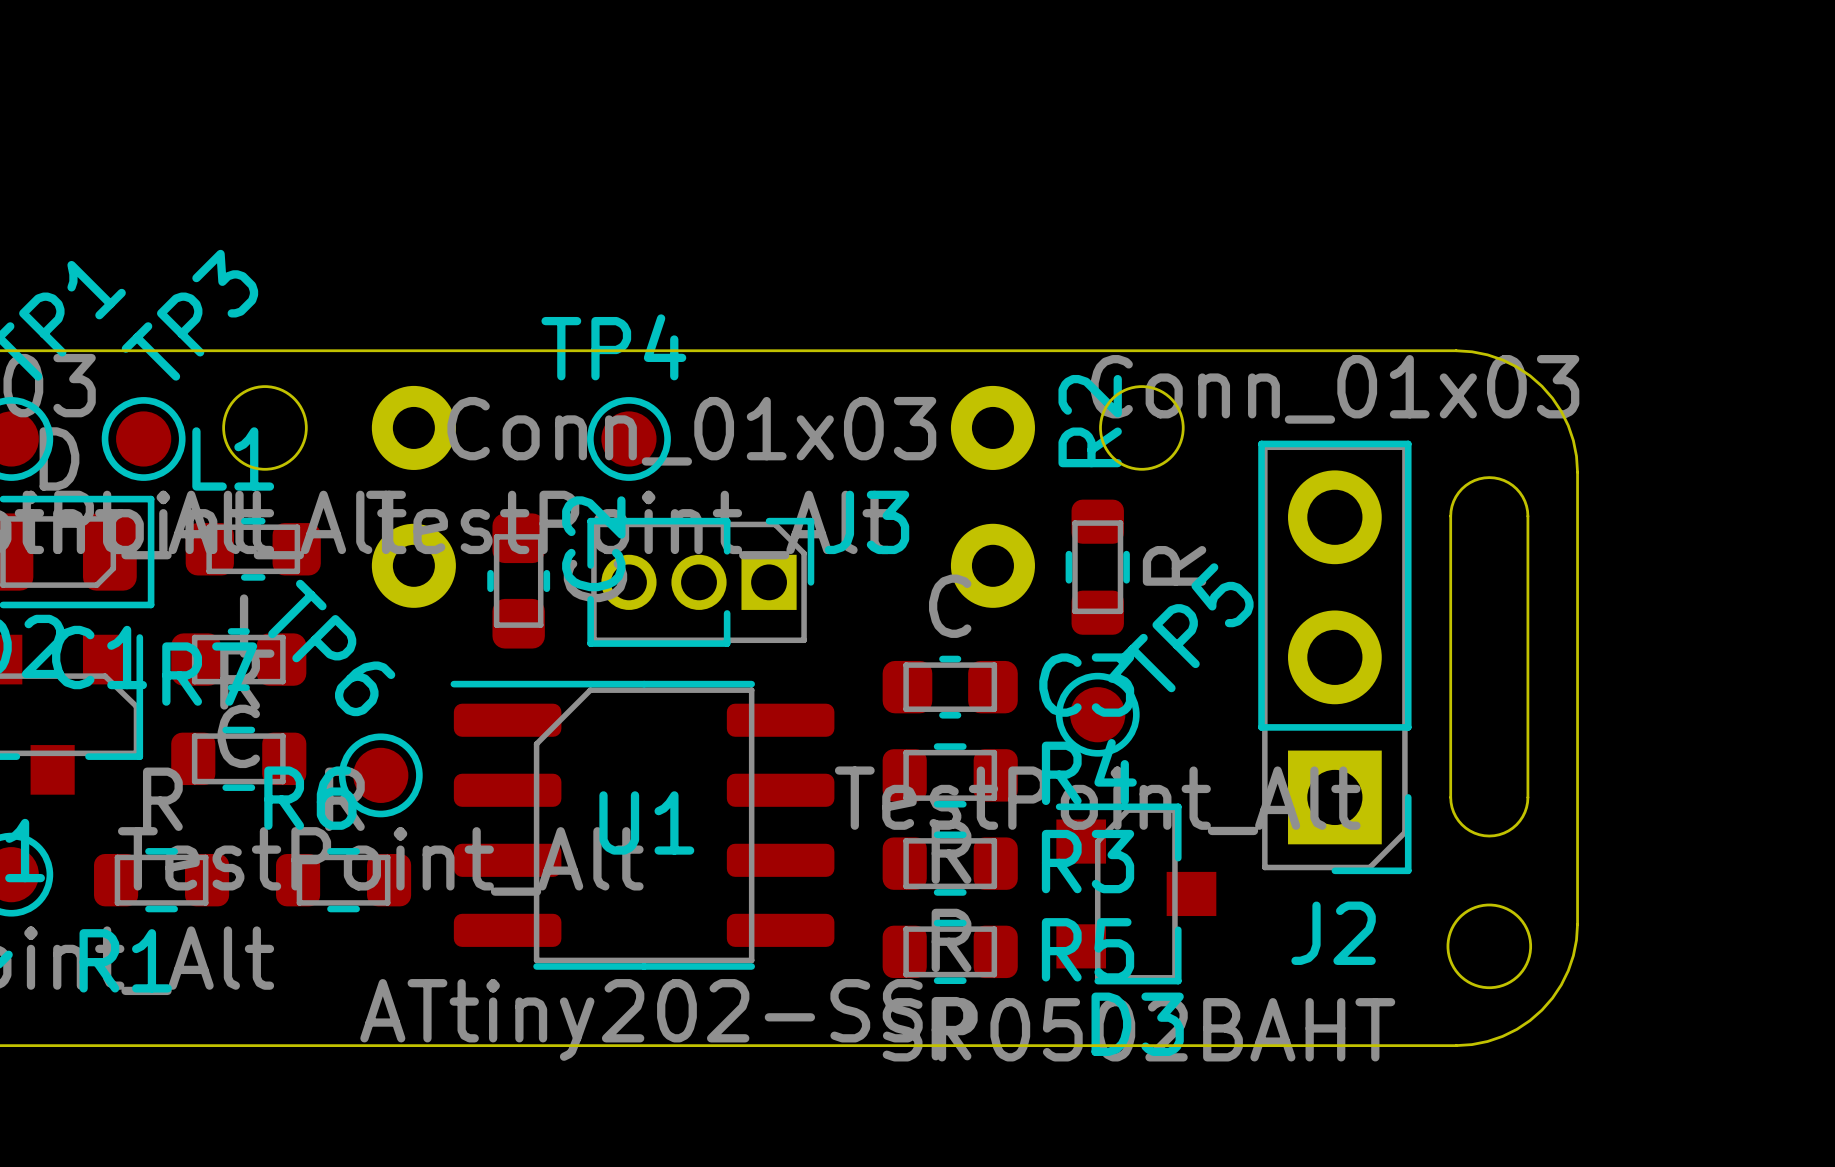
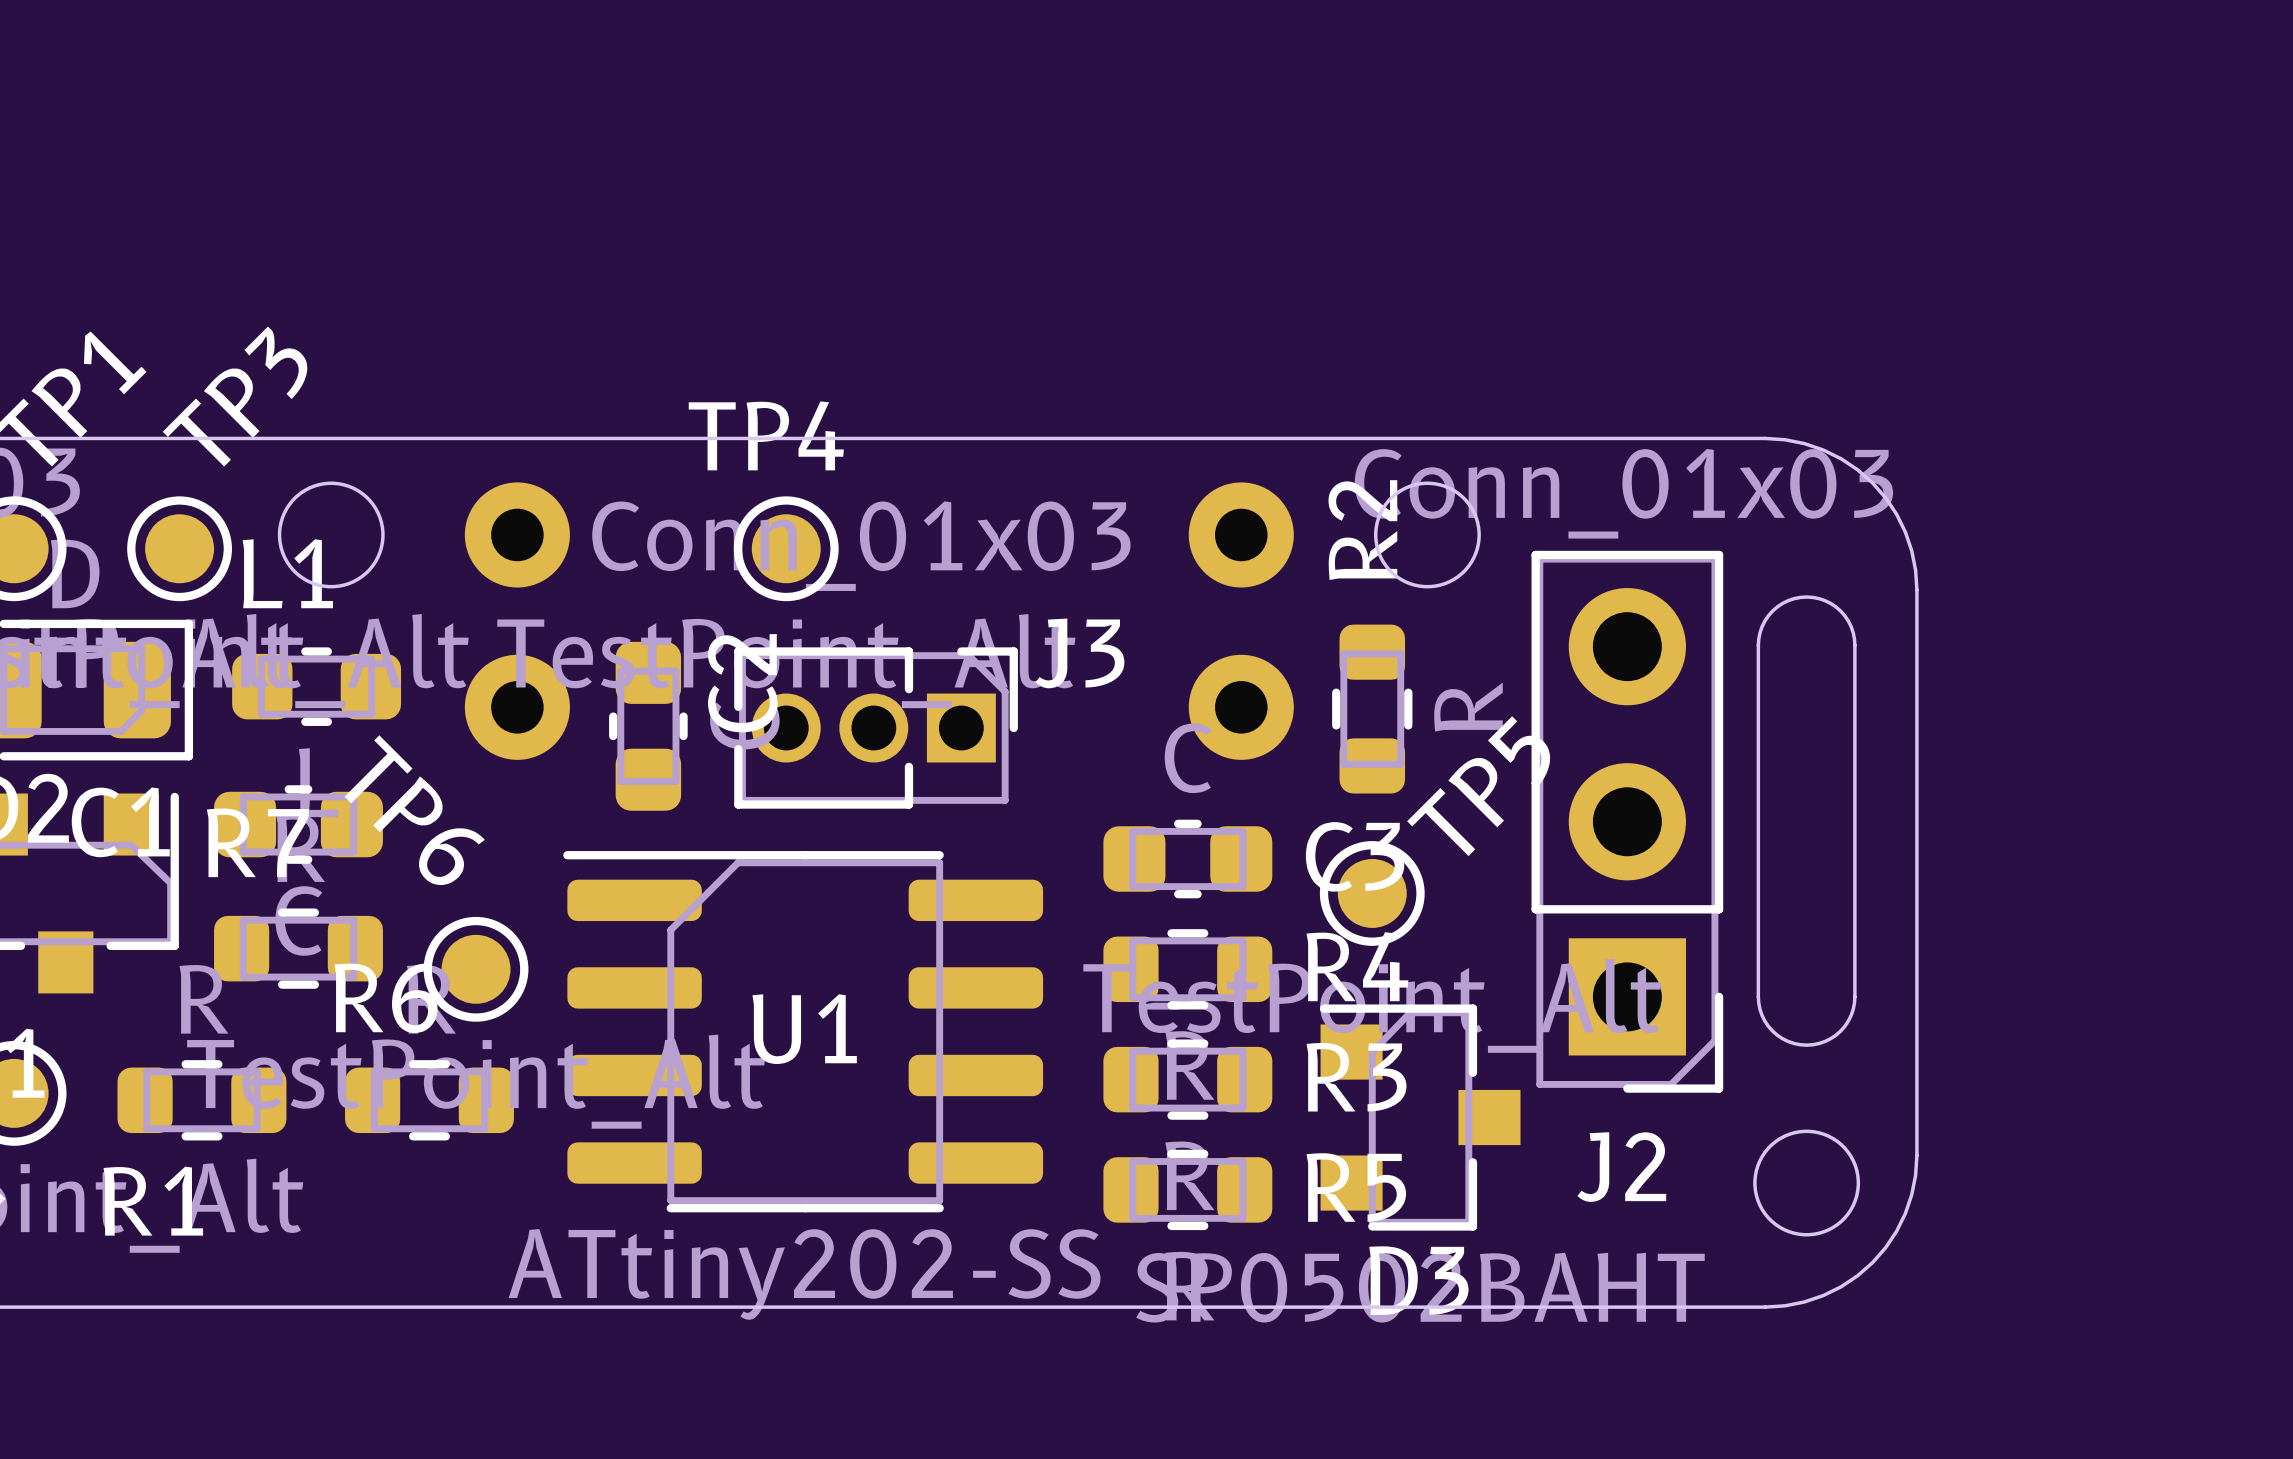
board edge: (1412, 350) (1456, 350) (1487, 354) (1516, 366) (1530, 375) (1552, 398) (1561, 411) (1573, 440) (1577, 472) (1577, 924) (1573, 955) (1561, 984) (1552, 998) (1530, 1020) (1516, 1029) (1487, 1041) (1472, 1044) (1412, 1045) -> (1765, 438) (1785, 439) (1823, 449) (1857, 469) (1872, 482) (1896, 514) (1905, 532) (1915, 570) (1916, 590) (1916, 1155) (1911, 1194) (1896, 1231) (1872, 1262) (1857, 1275) (1823, 1295) (1785, 1305) (1765, 1307)
board edge: (1450, 516) (1451, 802) (1455, 816) (1465, 828) (1479, 834) (1494, 835) (1504, 833) (1516, 824) (1524, 812) (1527, 802) (1527, 511) (1524, 501) (1516, 488) (1504, 480) (1489, 477) (1474, 480) (1462, 488) (1453, 501) (1450, 516) -> (1758, 645) (1758, 1003) (1764, 1021) (1777, 1035) (1794, 1043) (1812, 1044) (1825, 1041) (1840, 1031) (1851, 1015) (1854, 1003) (1854, 638) (1848, 621) (1835, 606) (1819, 598) (1800, 597) (1782, 603) (1768, 615) (1762, 626) (1758, 645)
J2 position: (1334, 657) -> (1627, 821)
round board edge position: (1489, 946) -> (1806, 1183)

